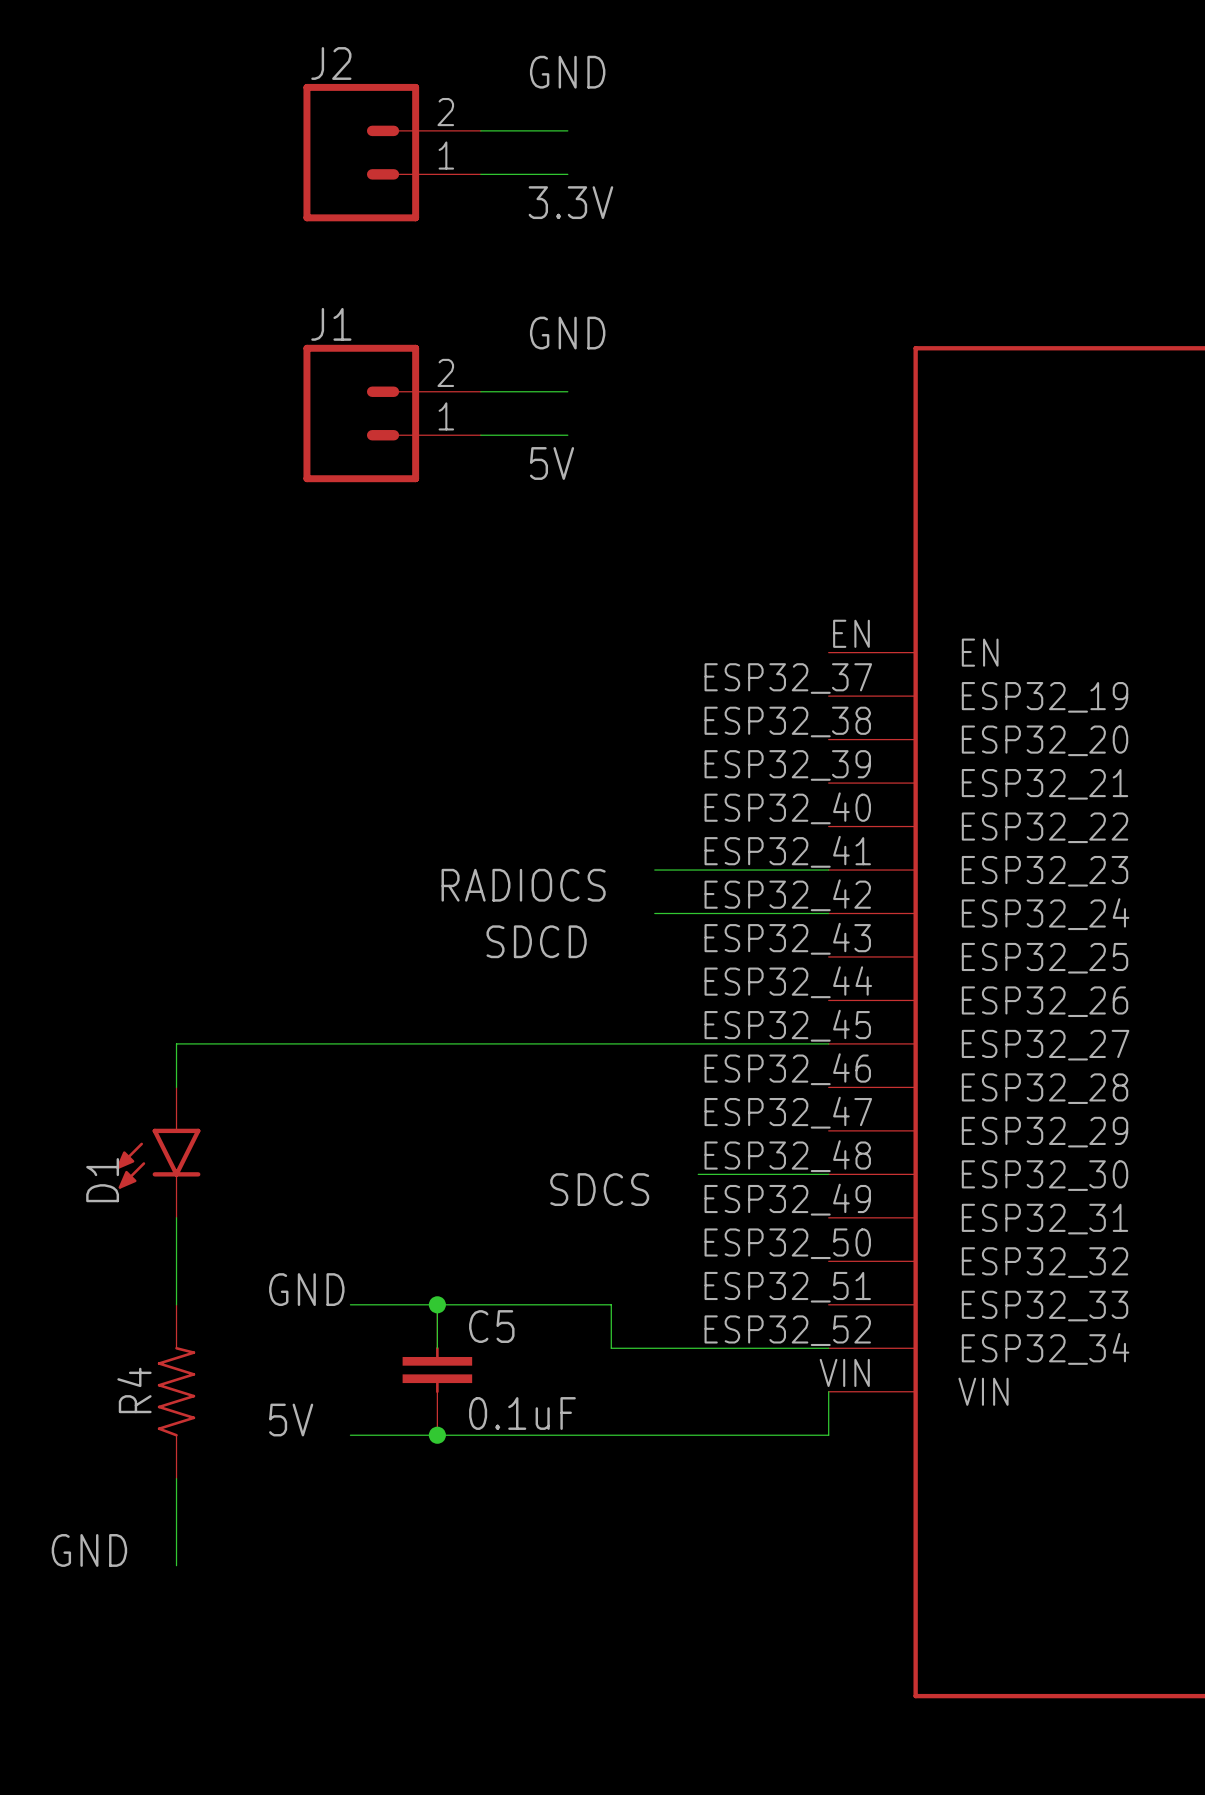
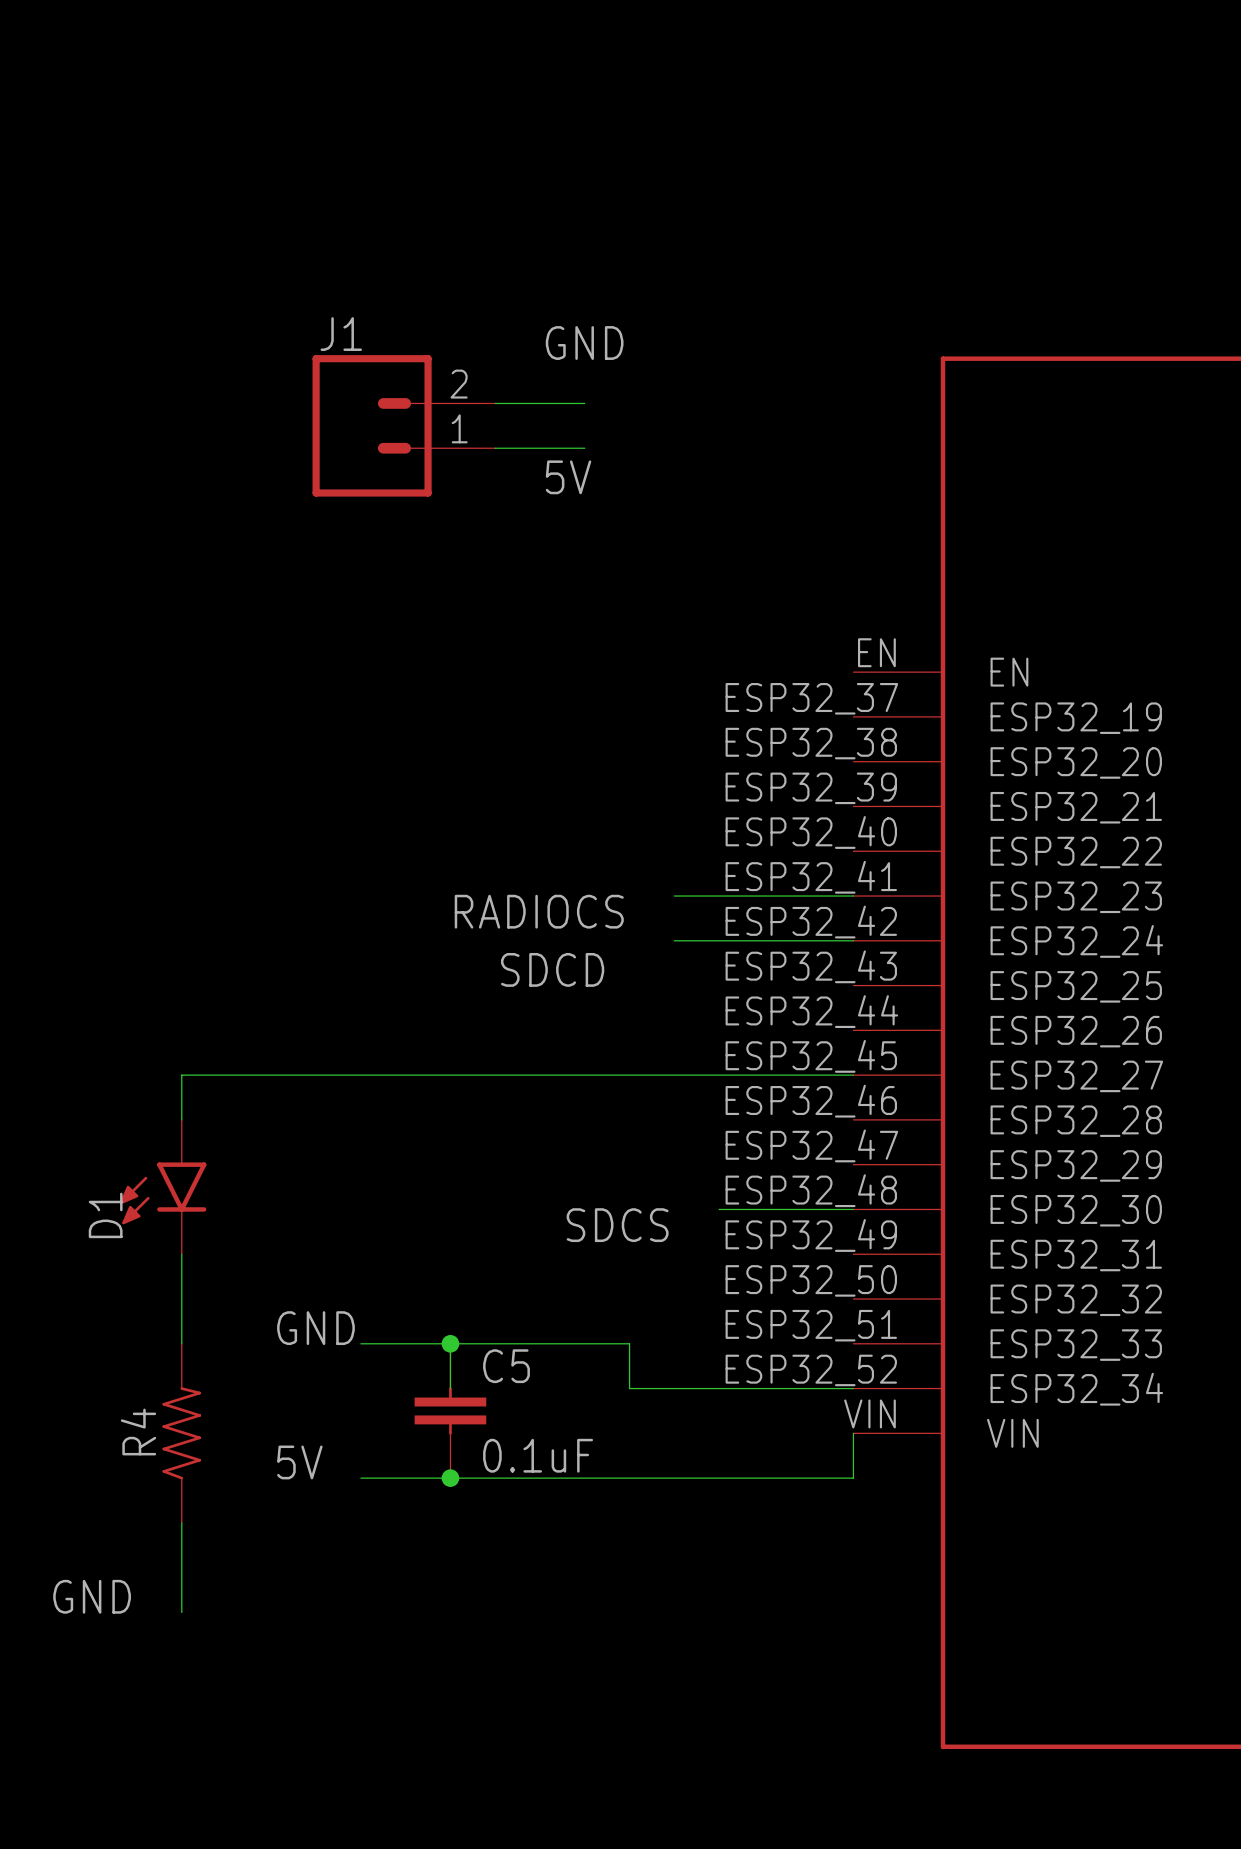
label: GND (567, 72) -> none
wire: (480, 130) (567, 130) -> none
J2: (392, 152) -> none
wire: (480, 174) (567, 174) -> none
label: 3.3V (570, 202) -> none

